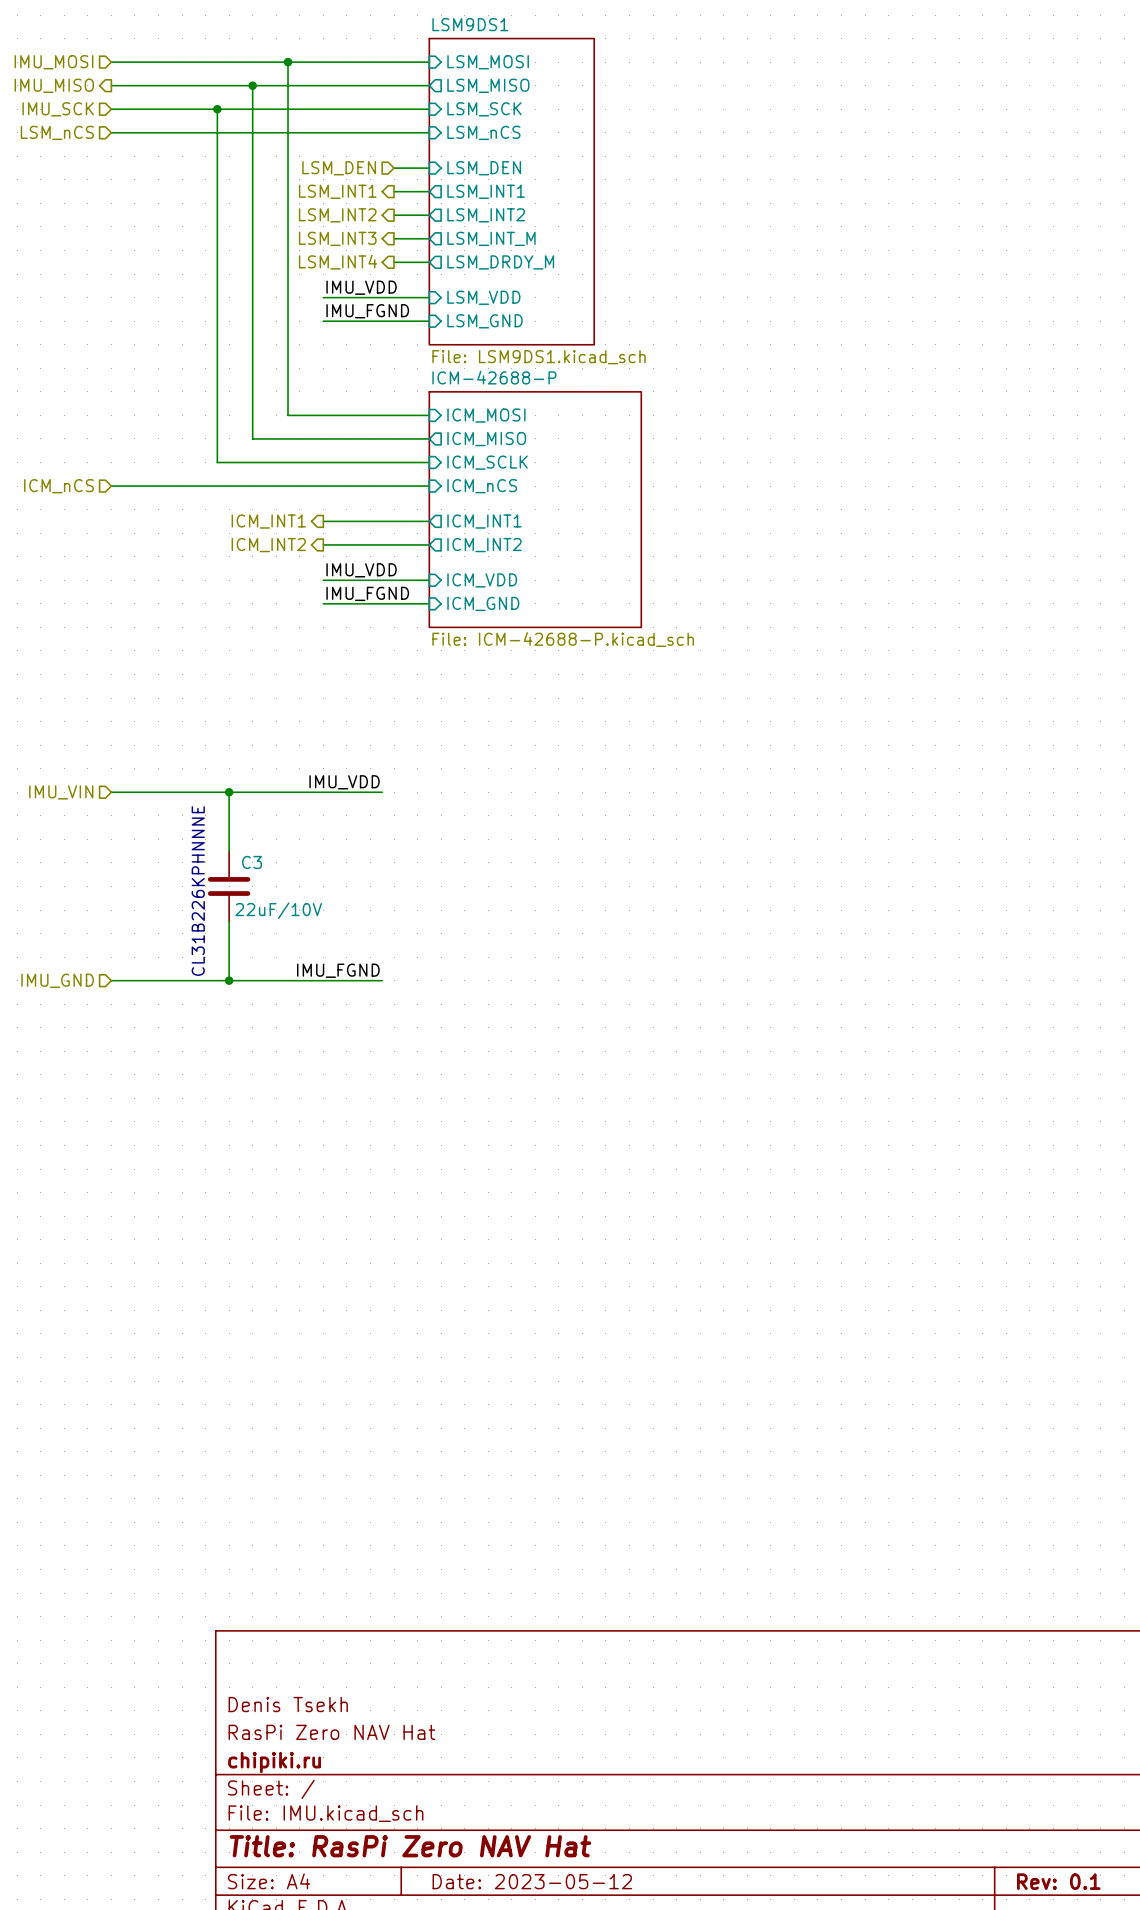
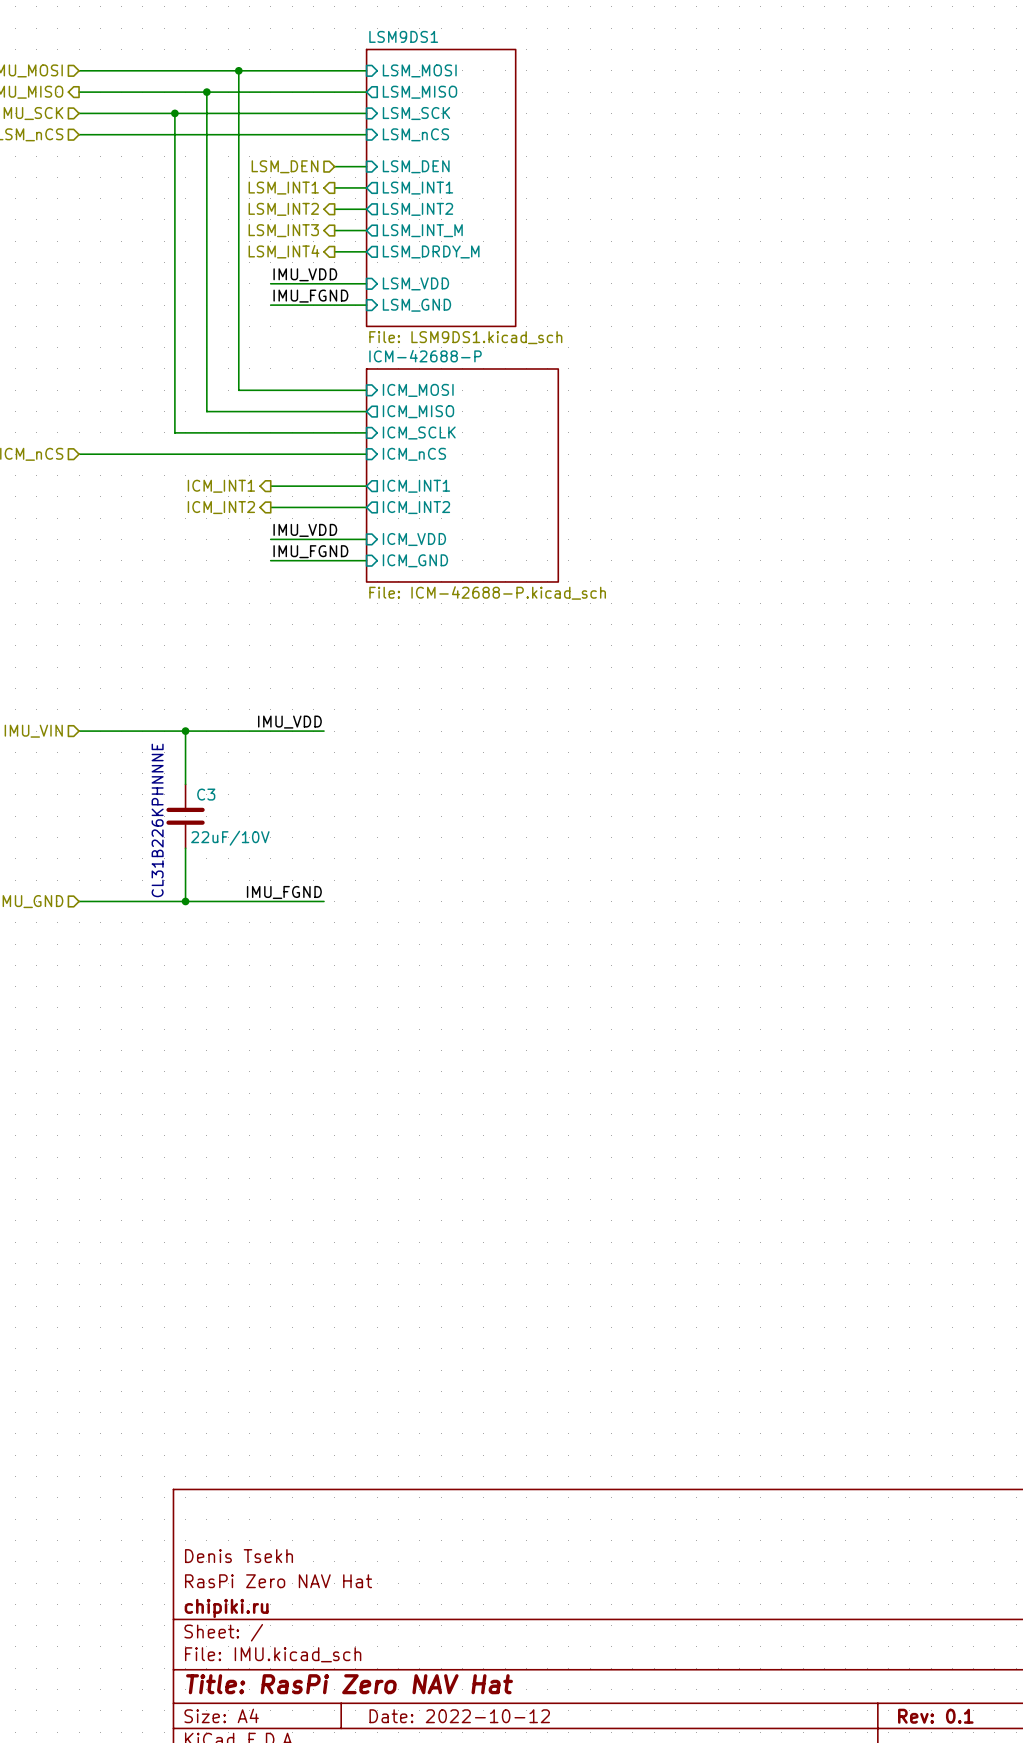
title block: Date: 2023-05-12 (532, 1881) -> Date: 2022-10-12 (459, 1716)

